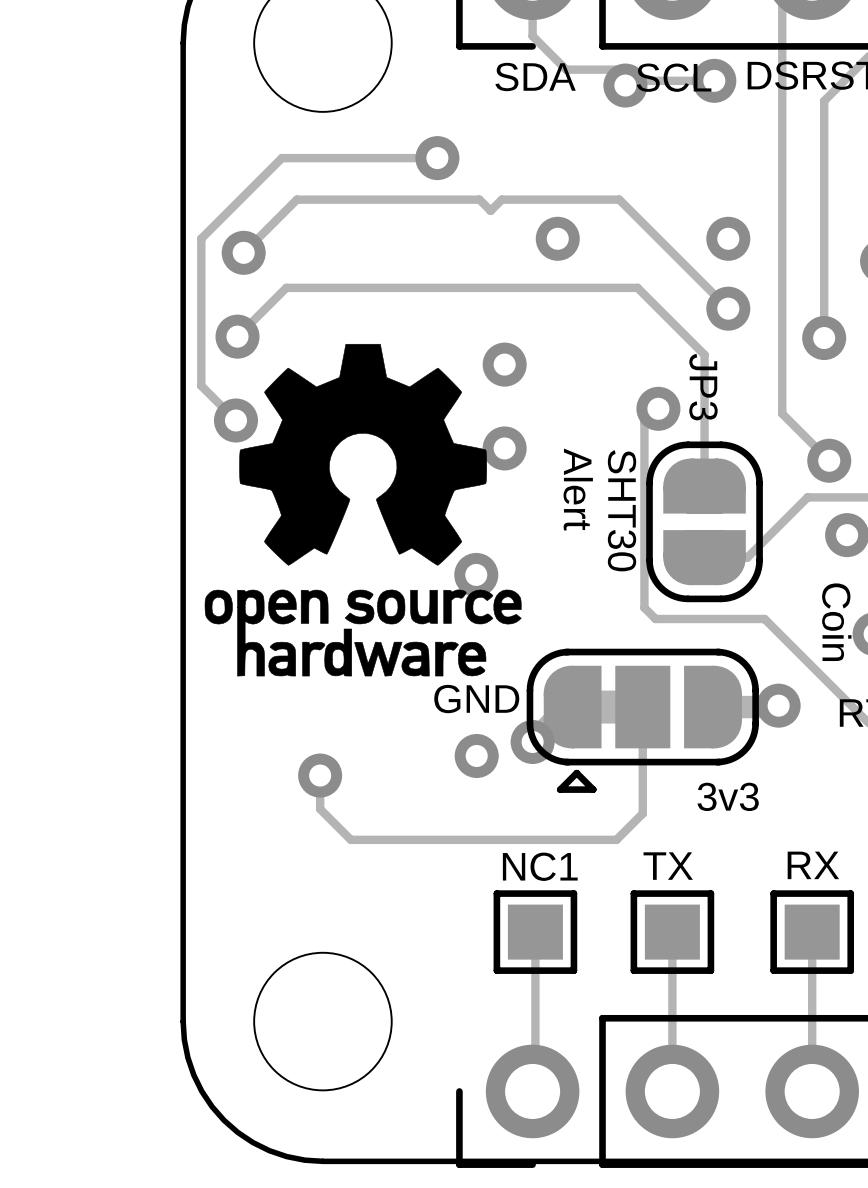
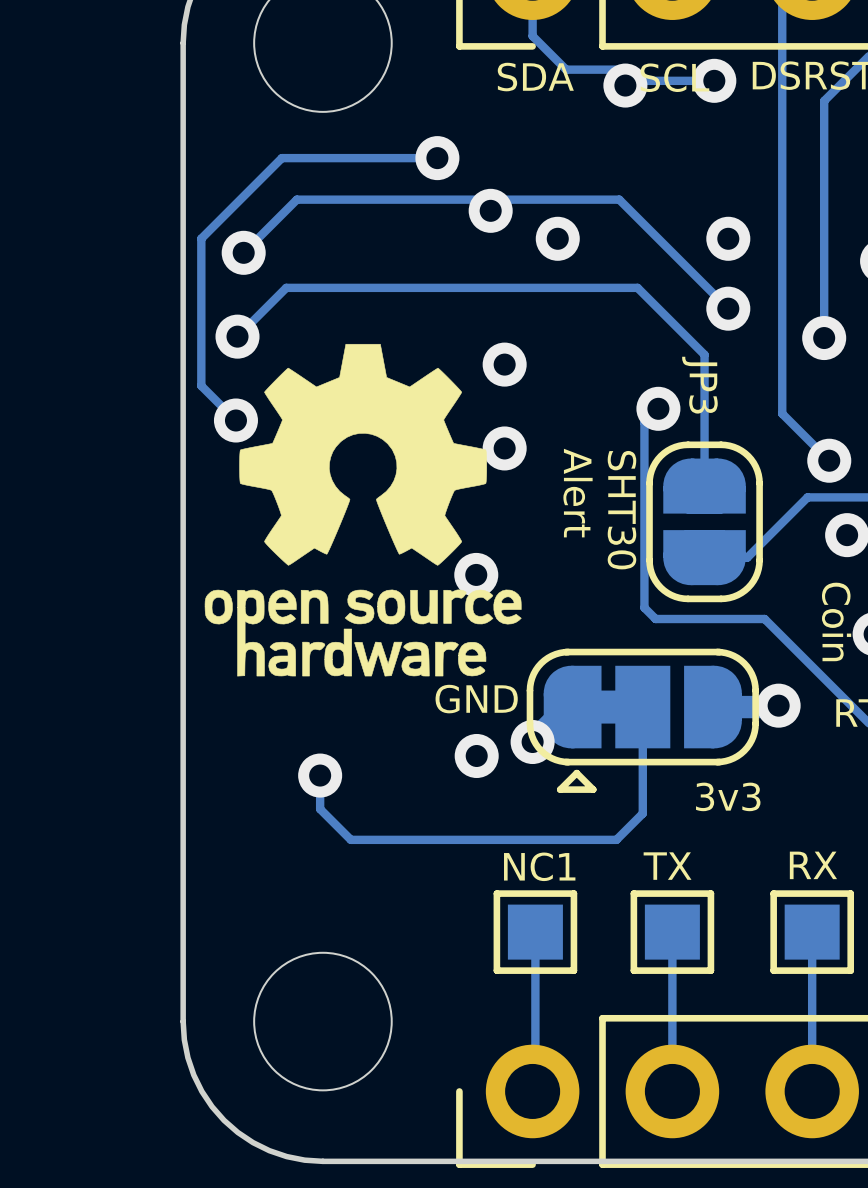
via: none -> (490, 210)

